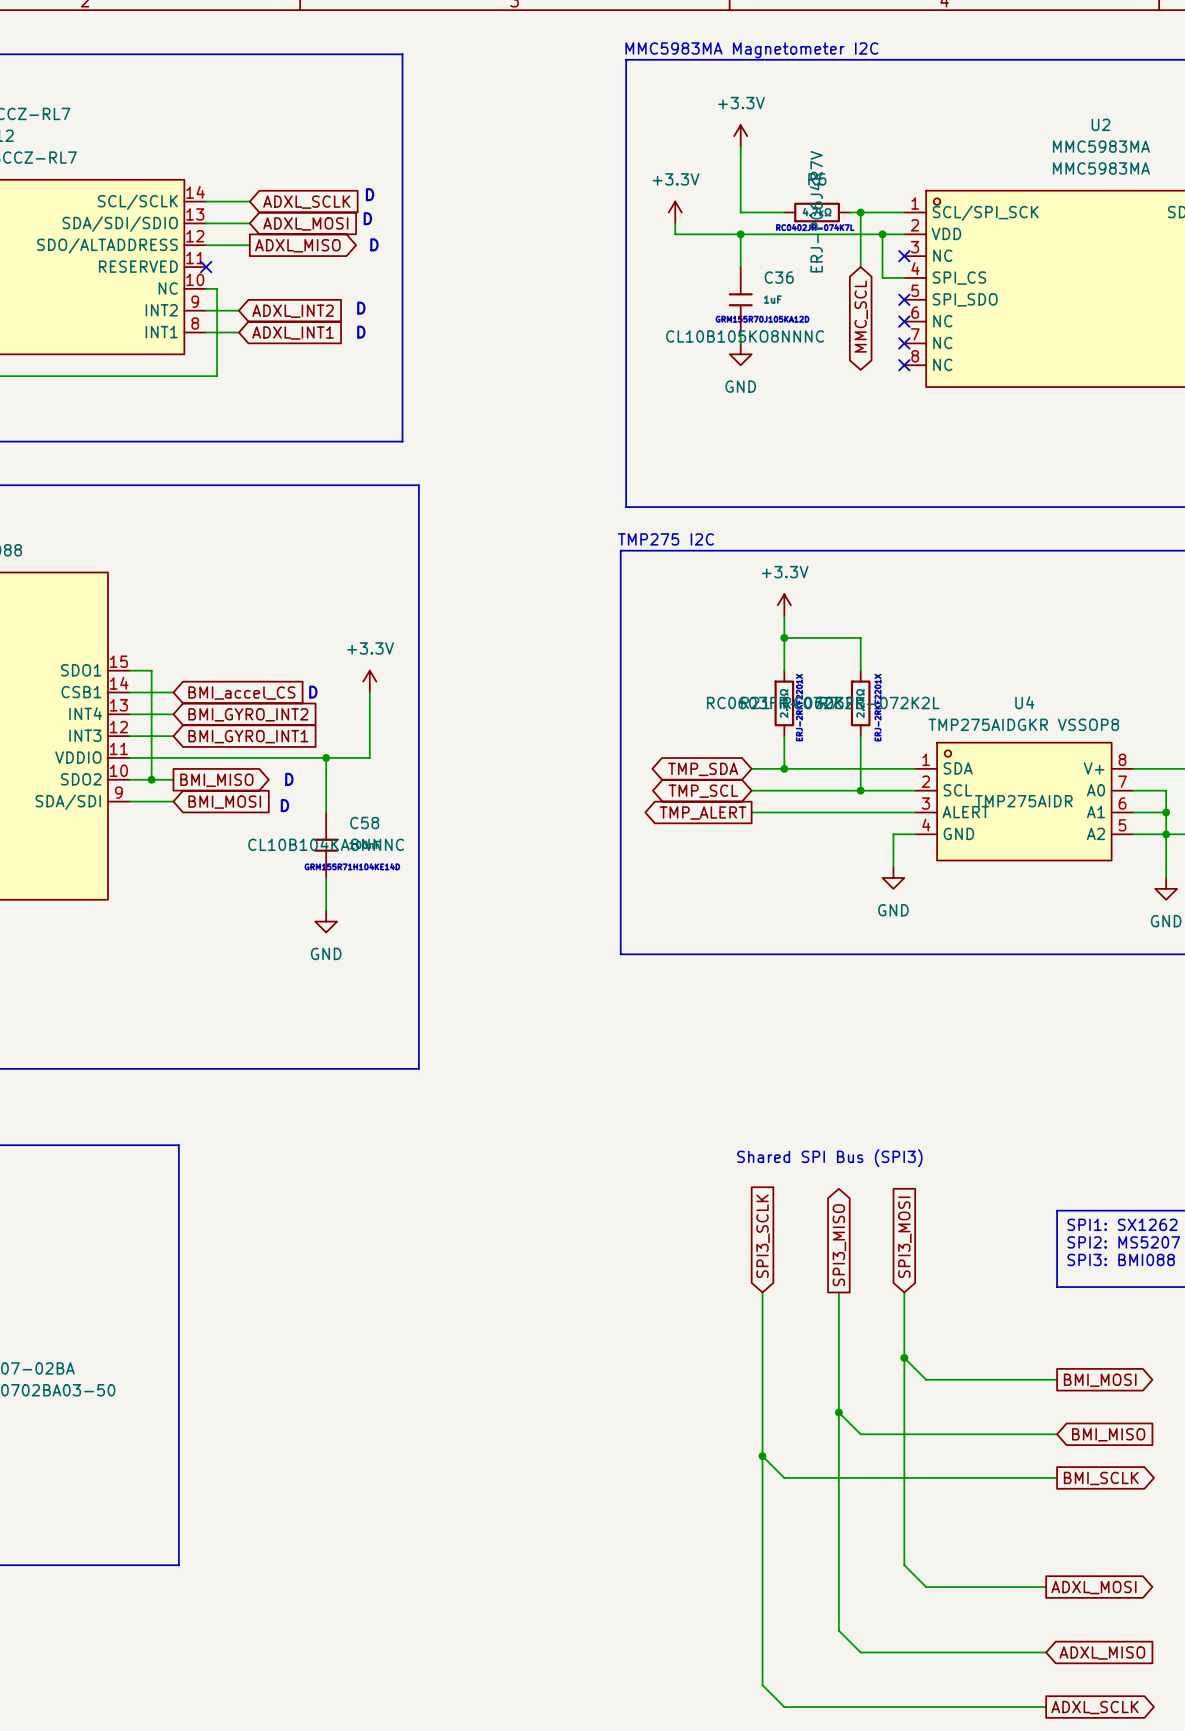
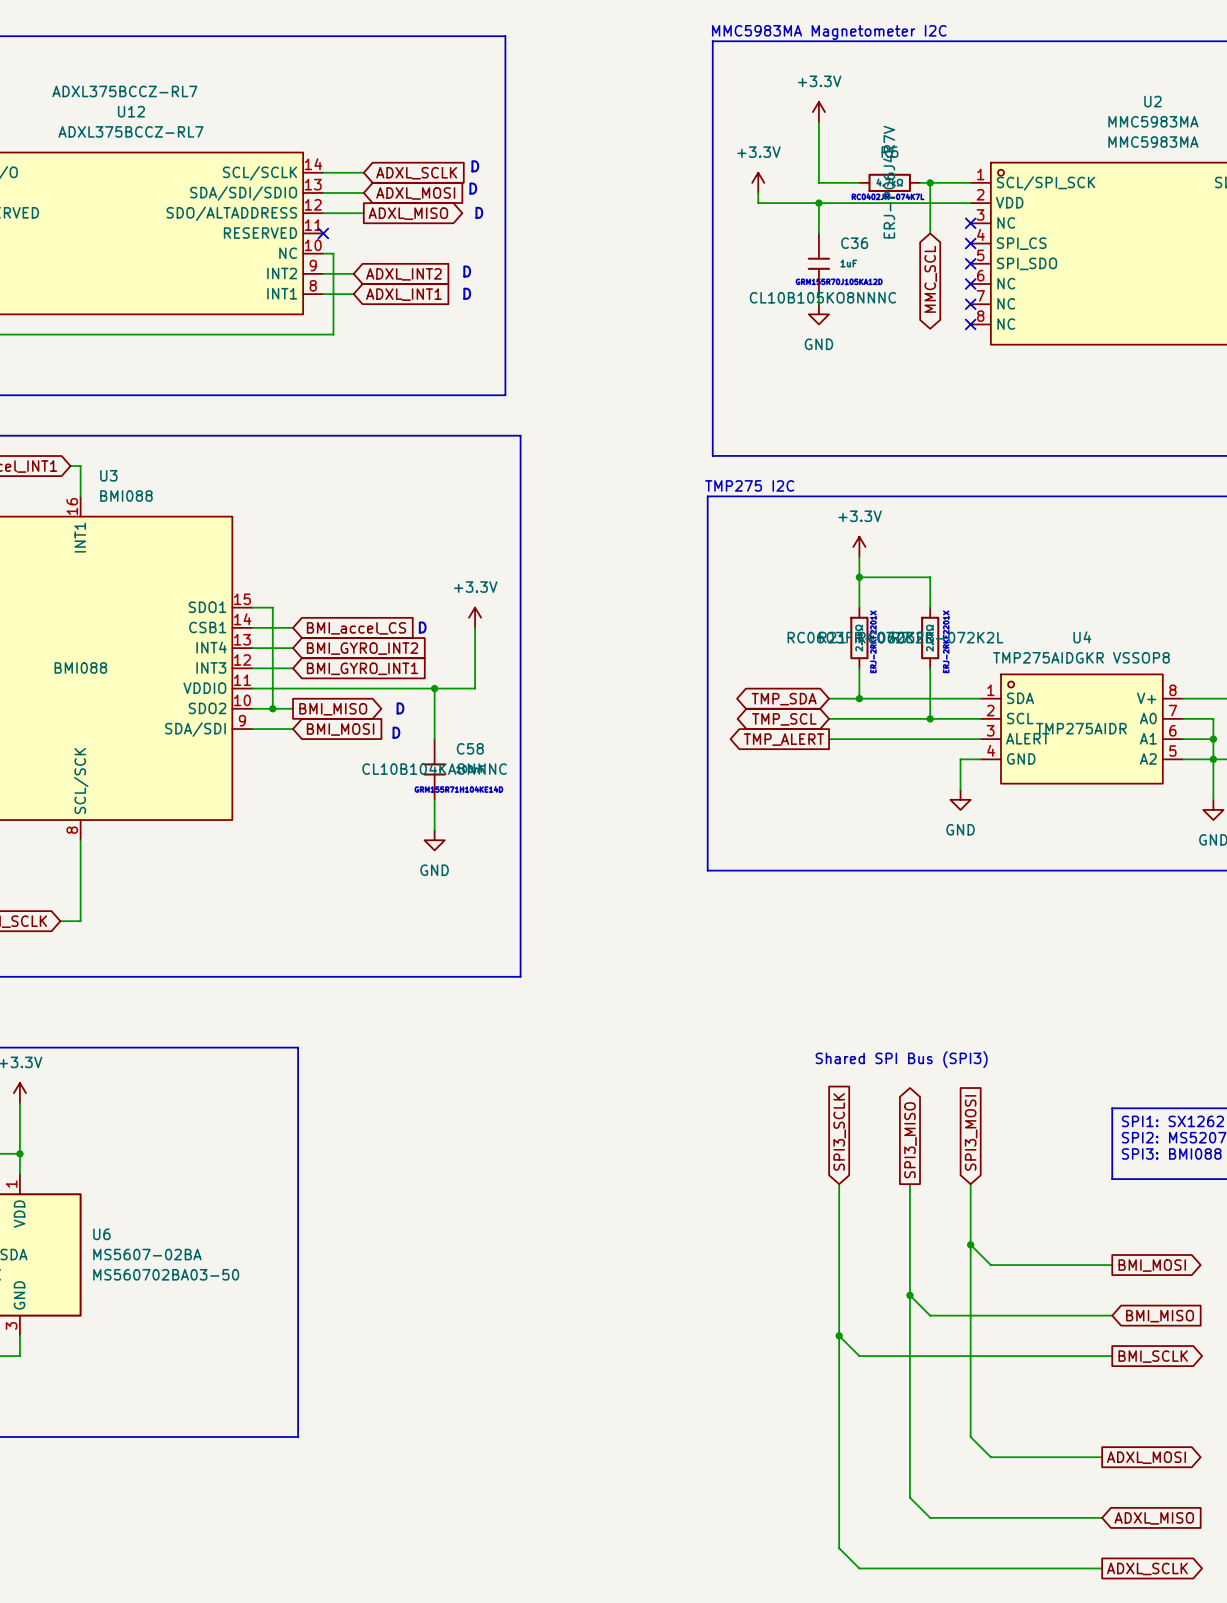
wire: (882, 234) (882, 277) (904, 277) -> none
junction: (882, 234) -> none
no-connect mark: none -> (970, 243)

